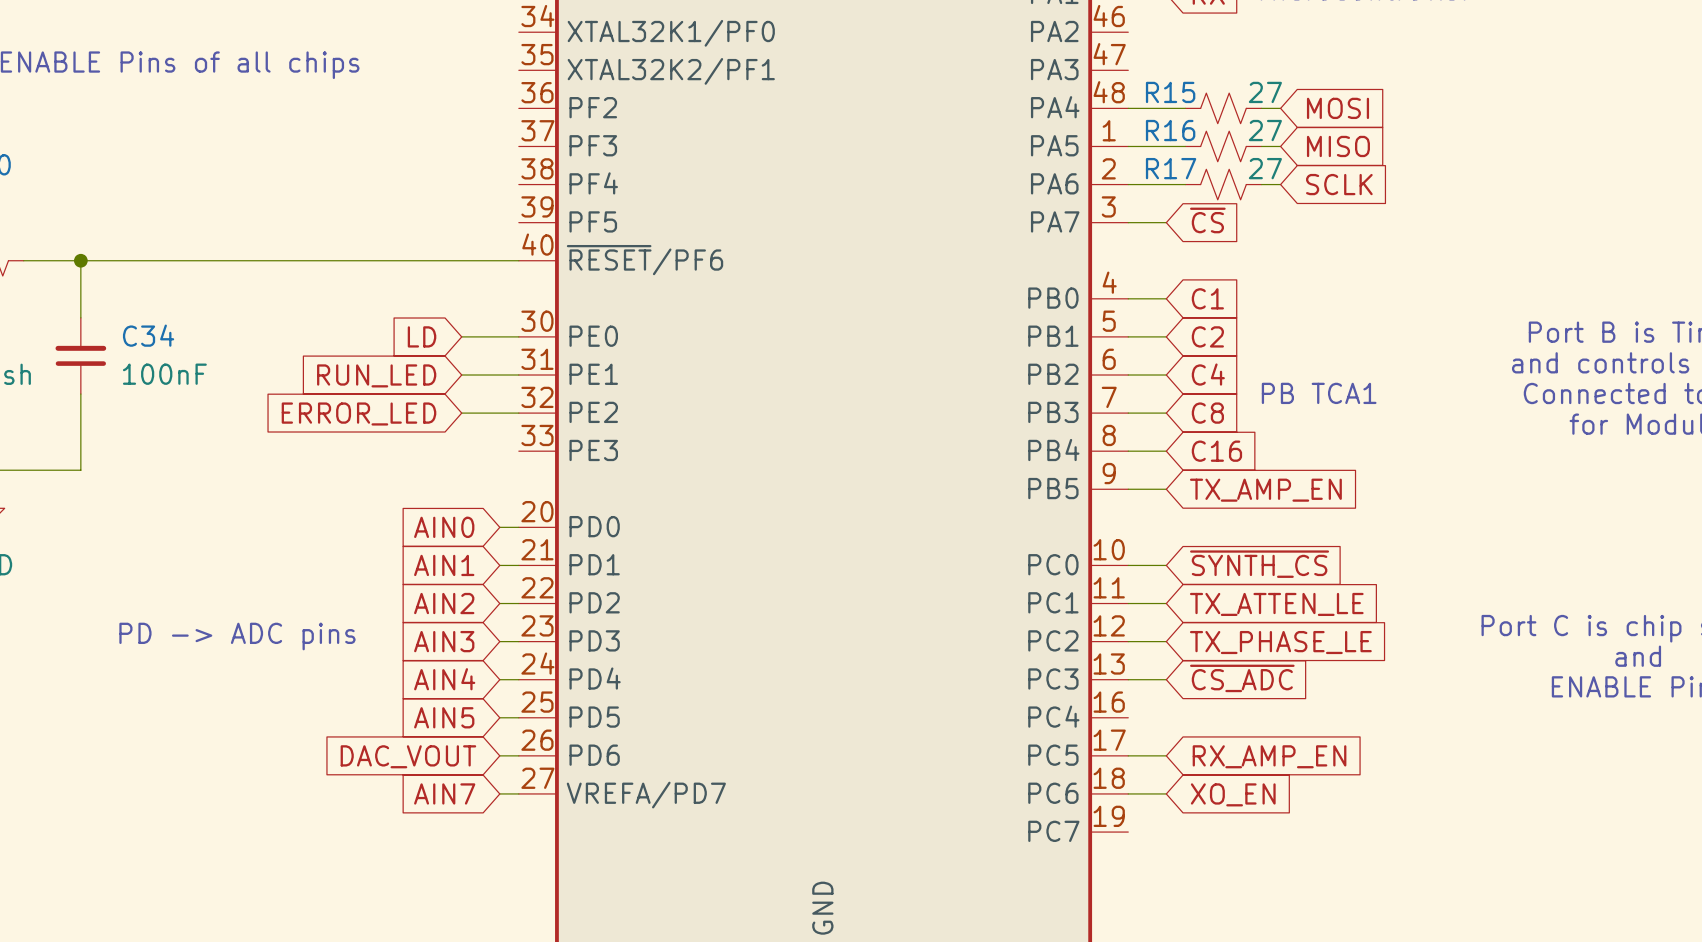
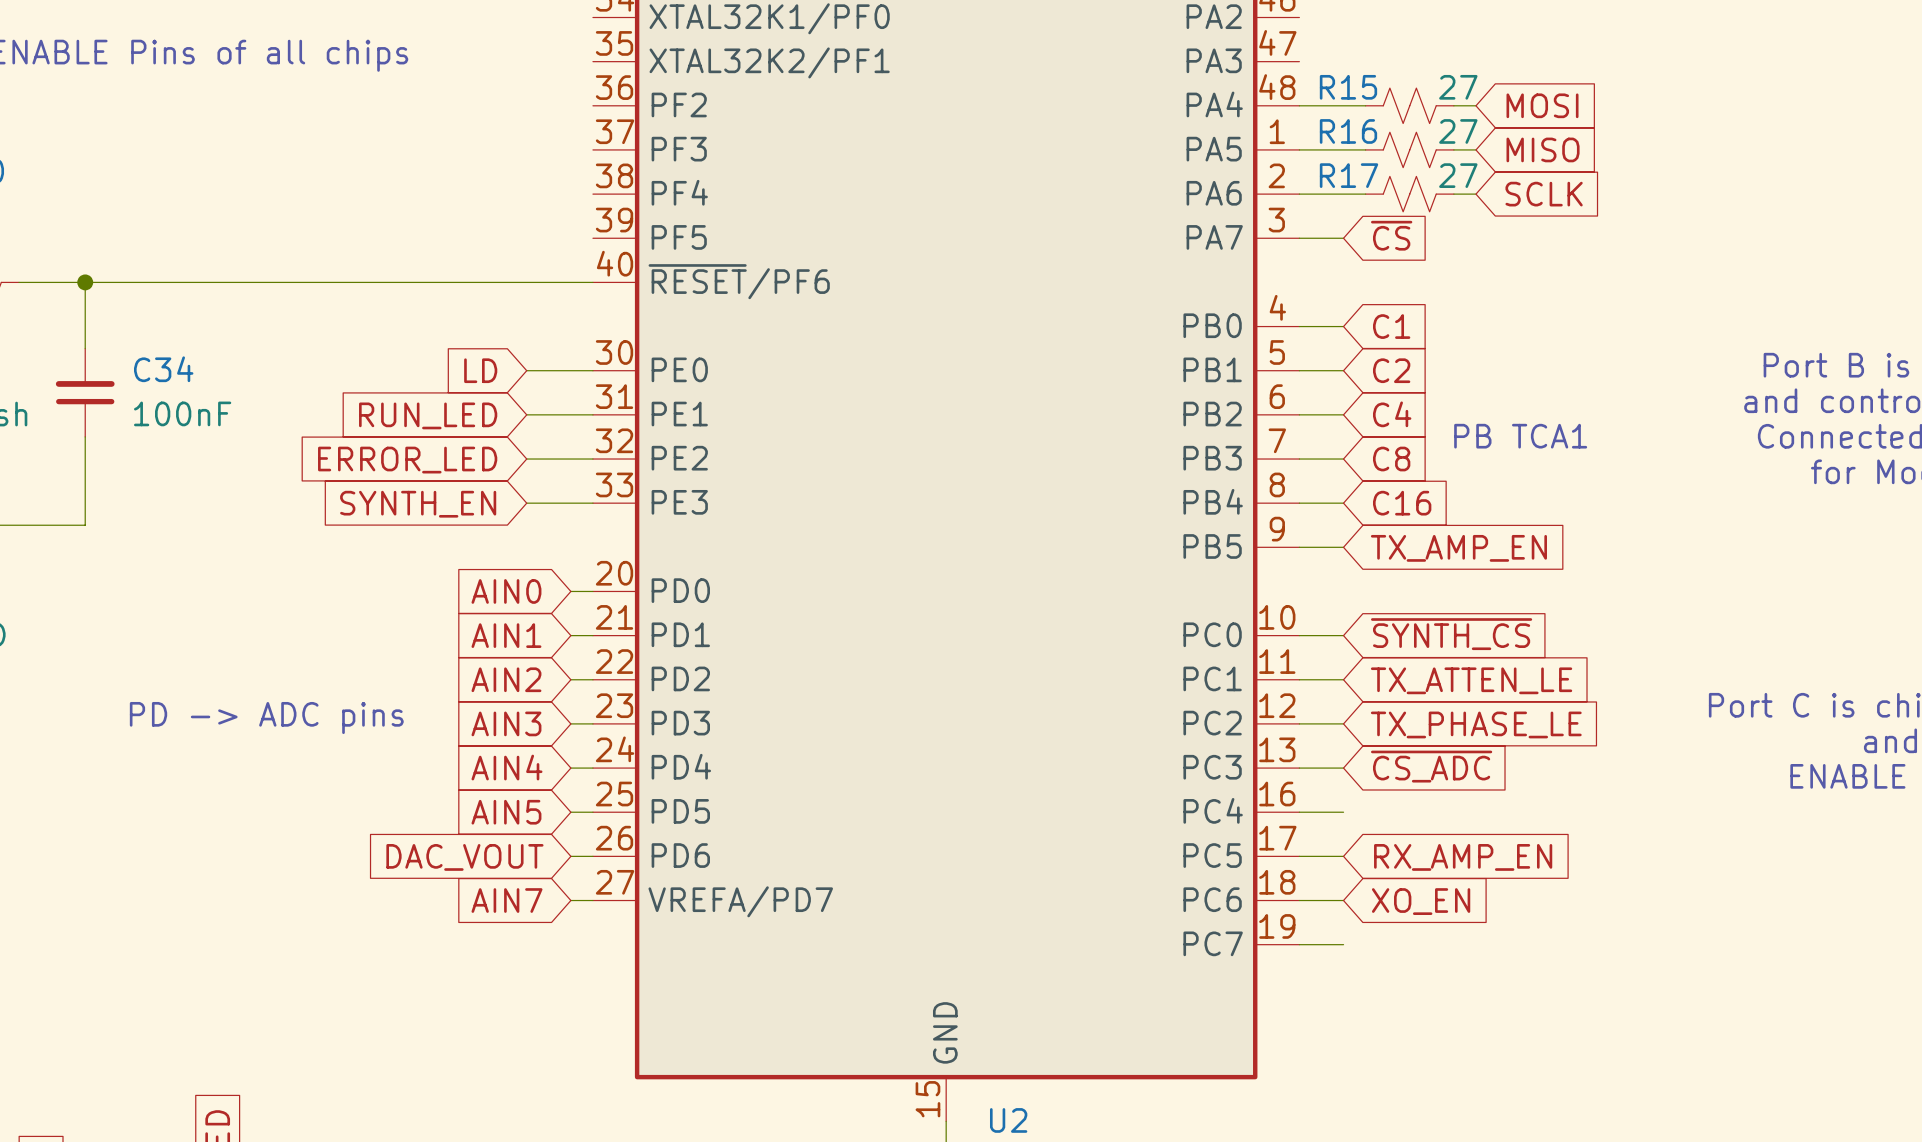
wire: none -> (526, 503) (592, 503)
global label: none -> SYNTH_EN (418, 504)
wire: none -> (1299, 812) (1343, 812)
wire: none -> (1299, 944) (1343, 944)

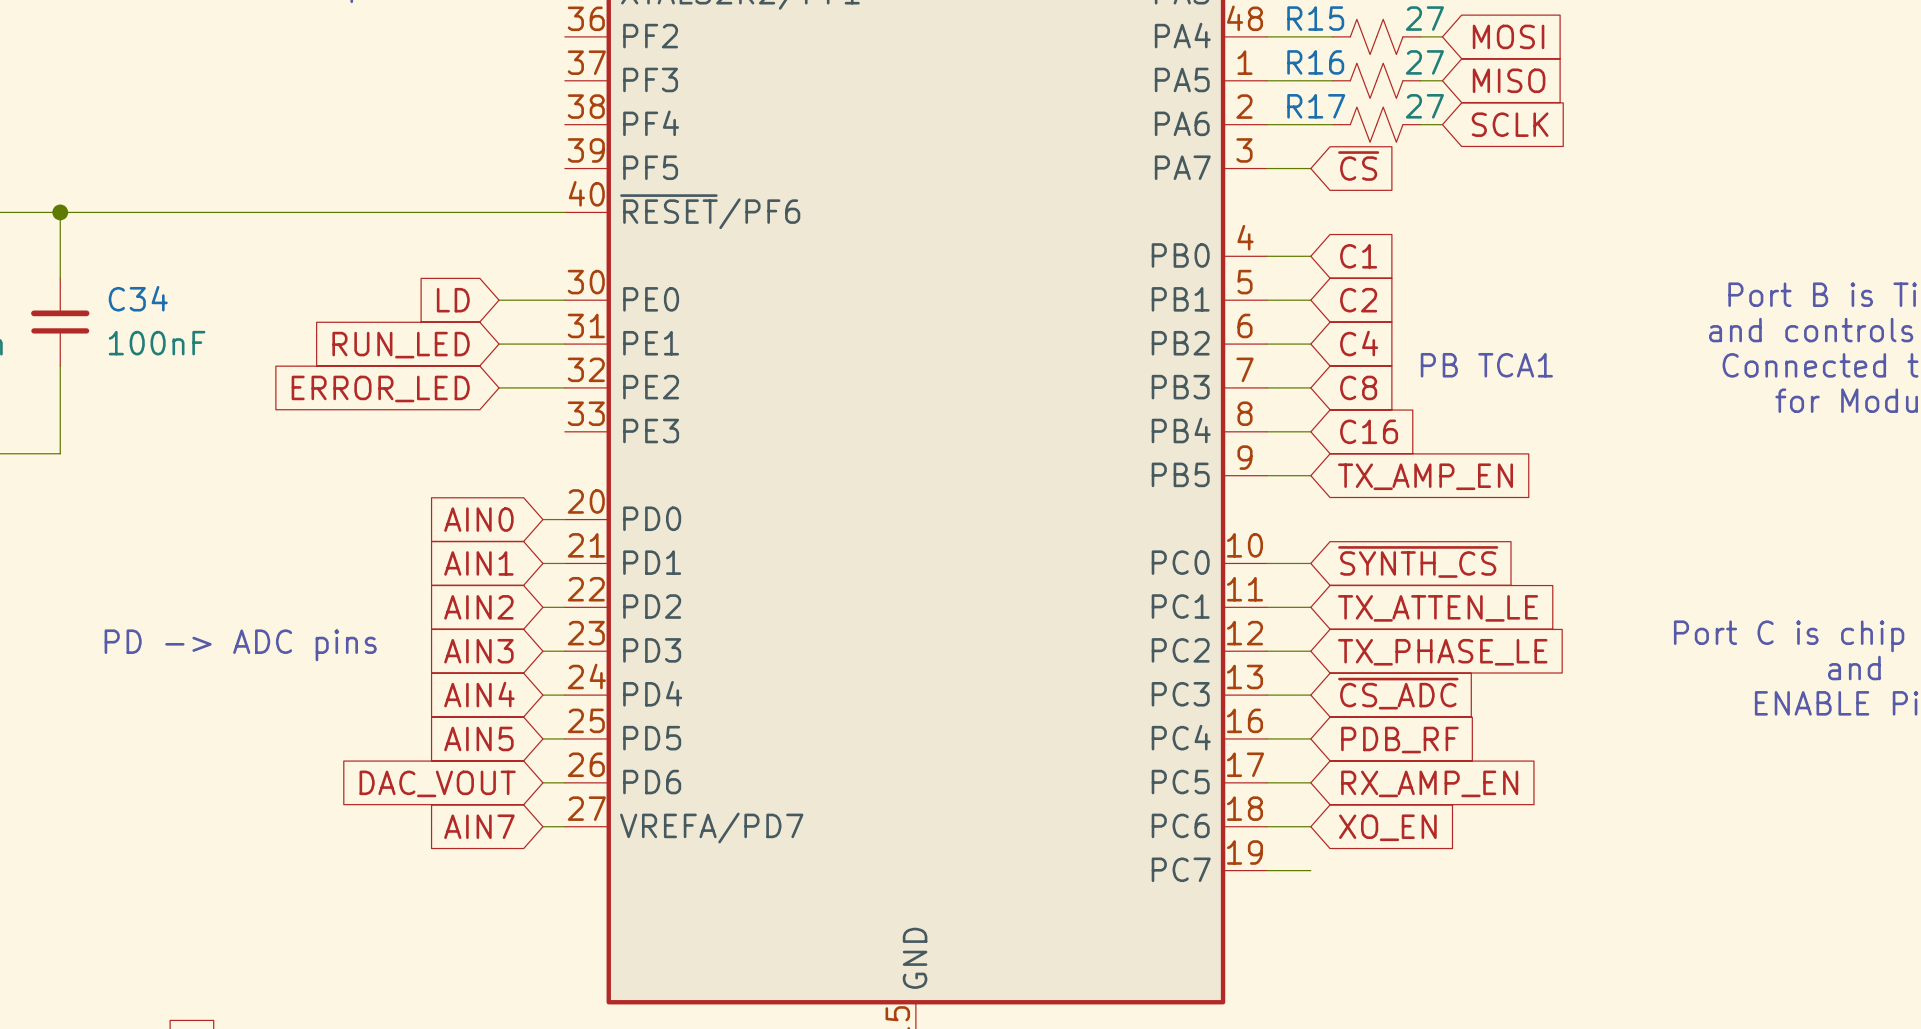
wire: (526, 503) (592, 503) -> none
global label: SYNTH_EN (418, 504) -> none
global label: none -> PDB_RF (1399, 740)

